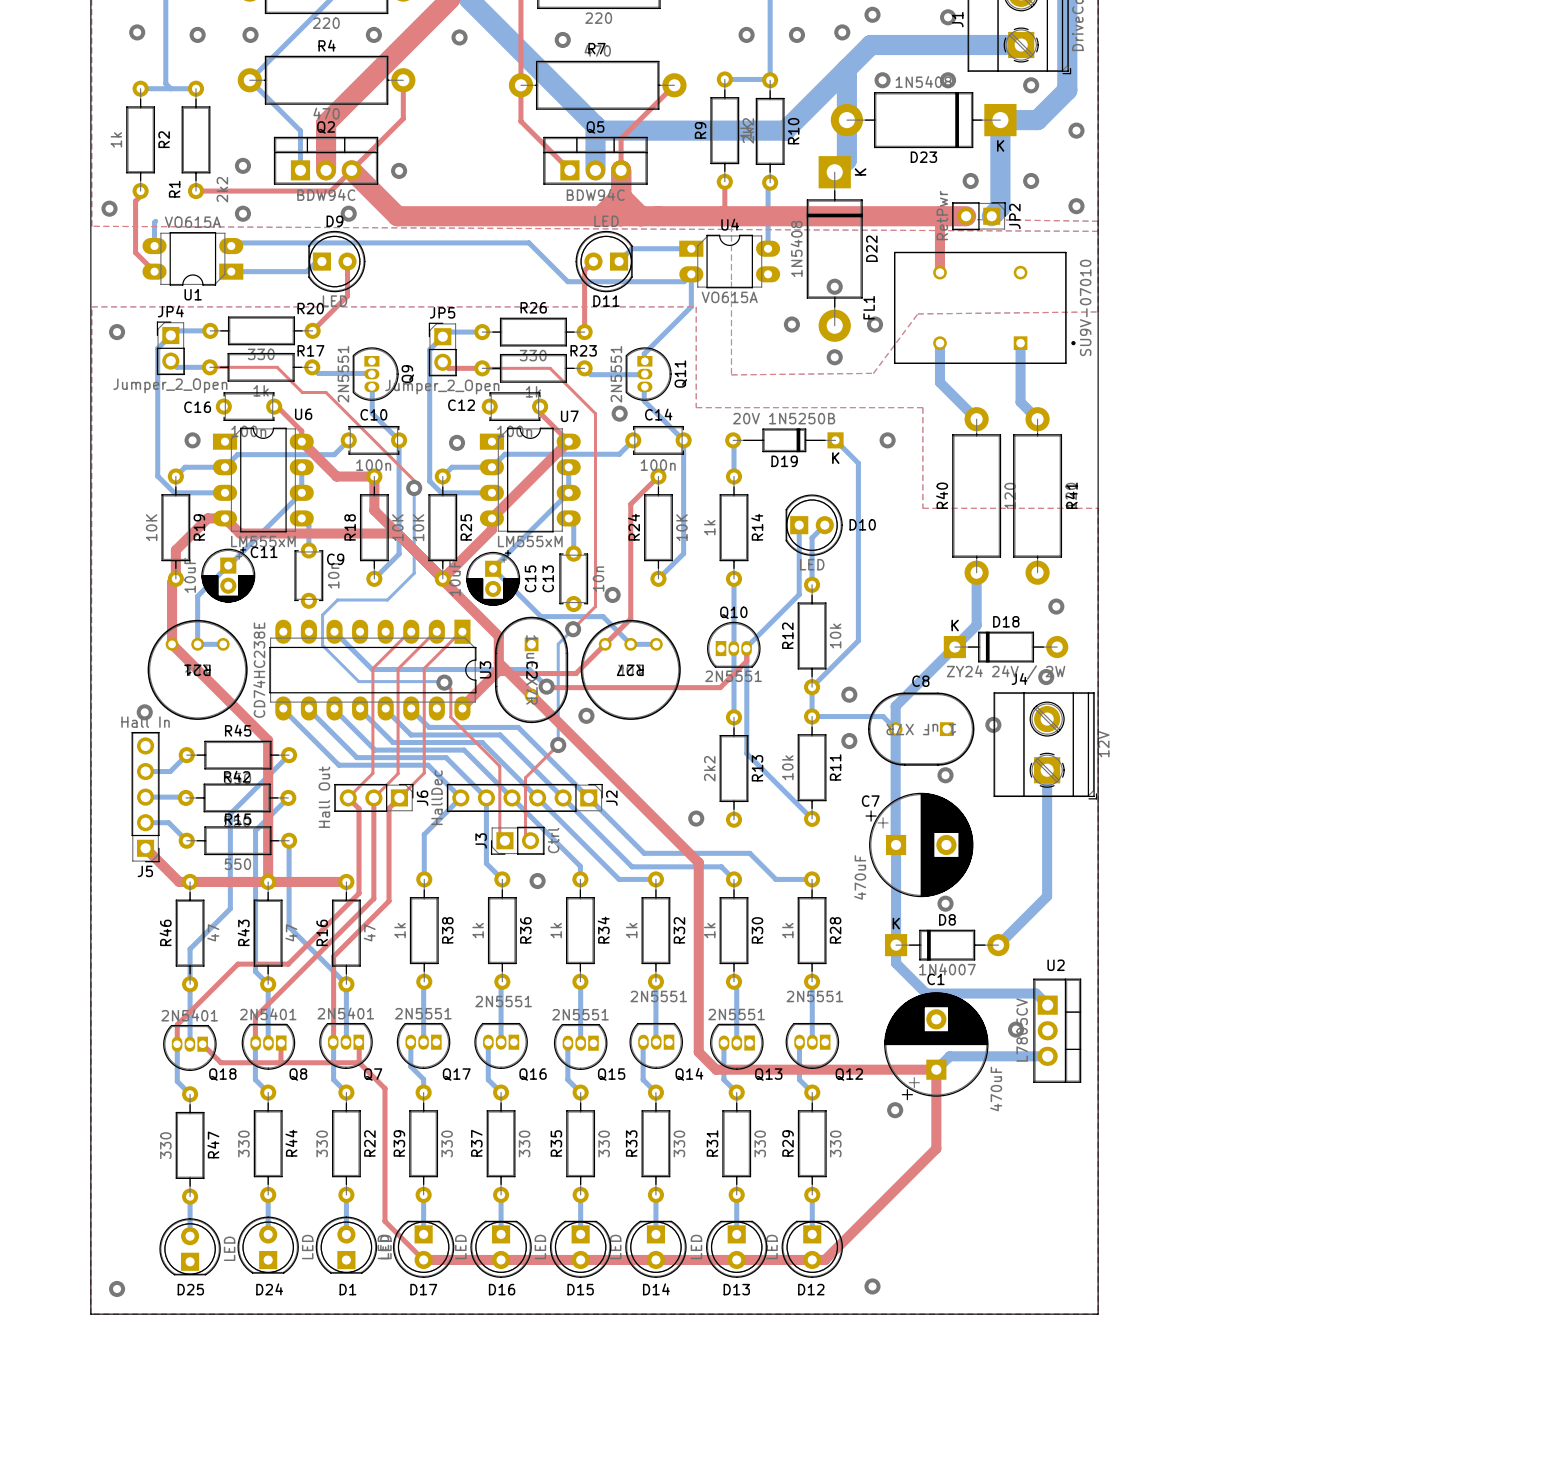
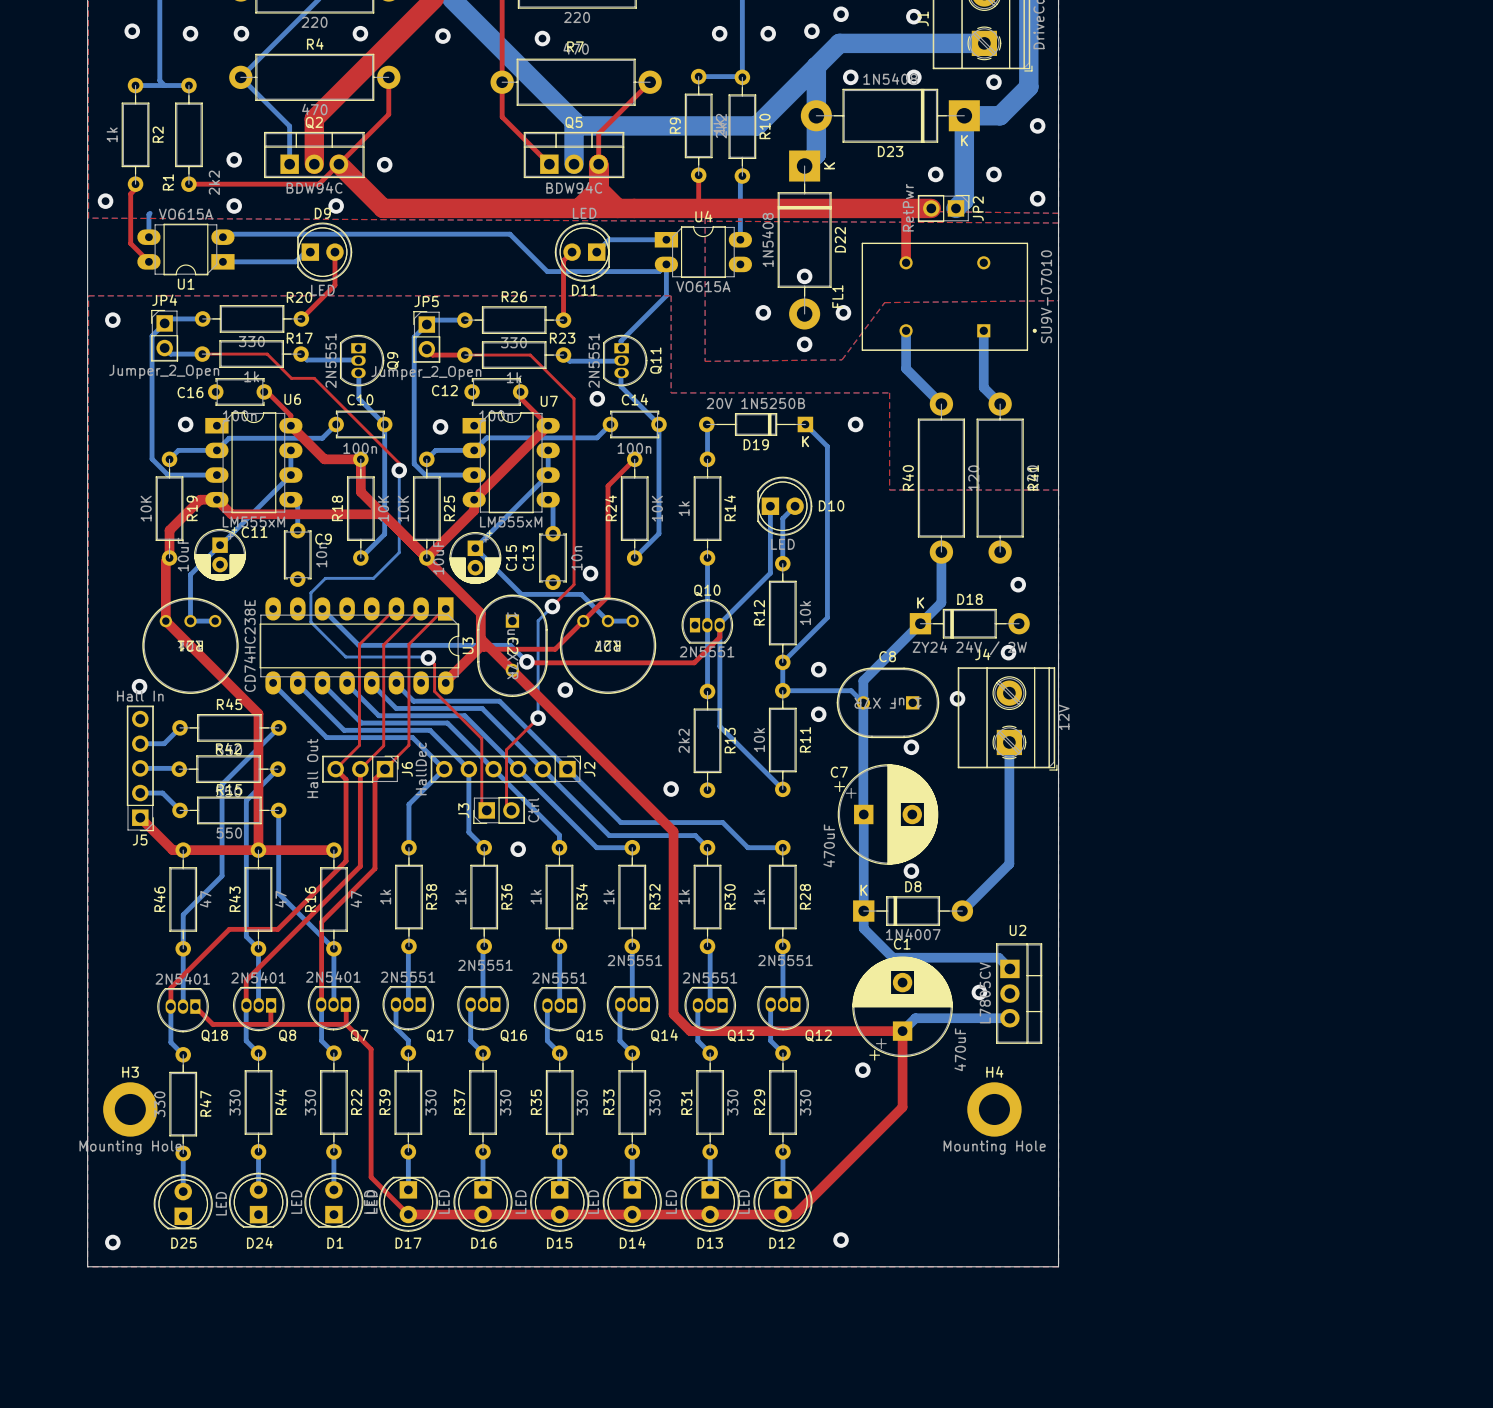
H3: none -> Mounting Hole (130, 1109)
H4: none -> Mounting Hole (994, 1109)

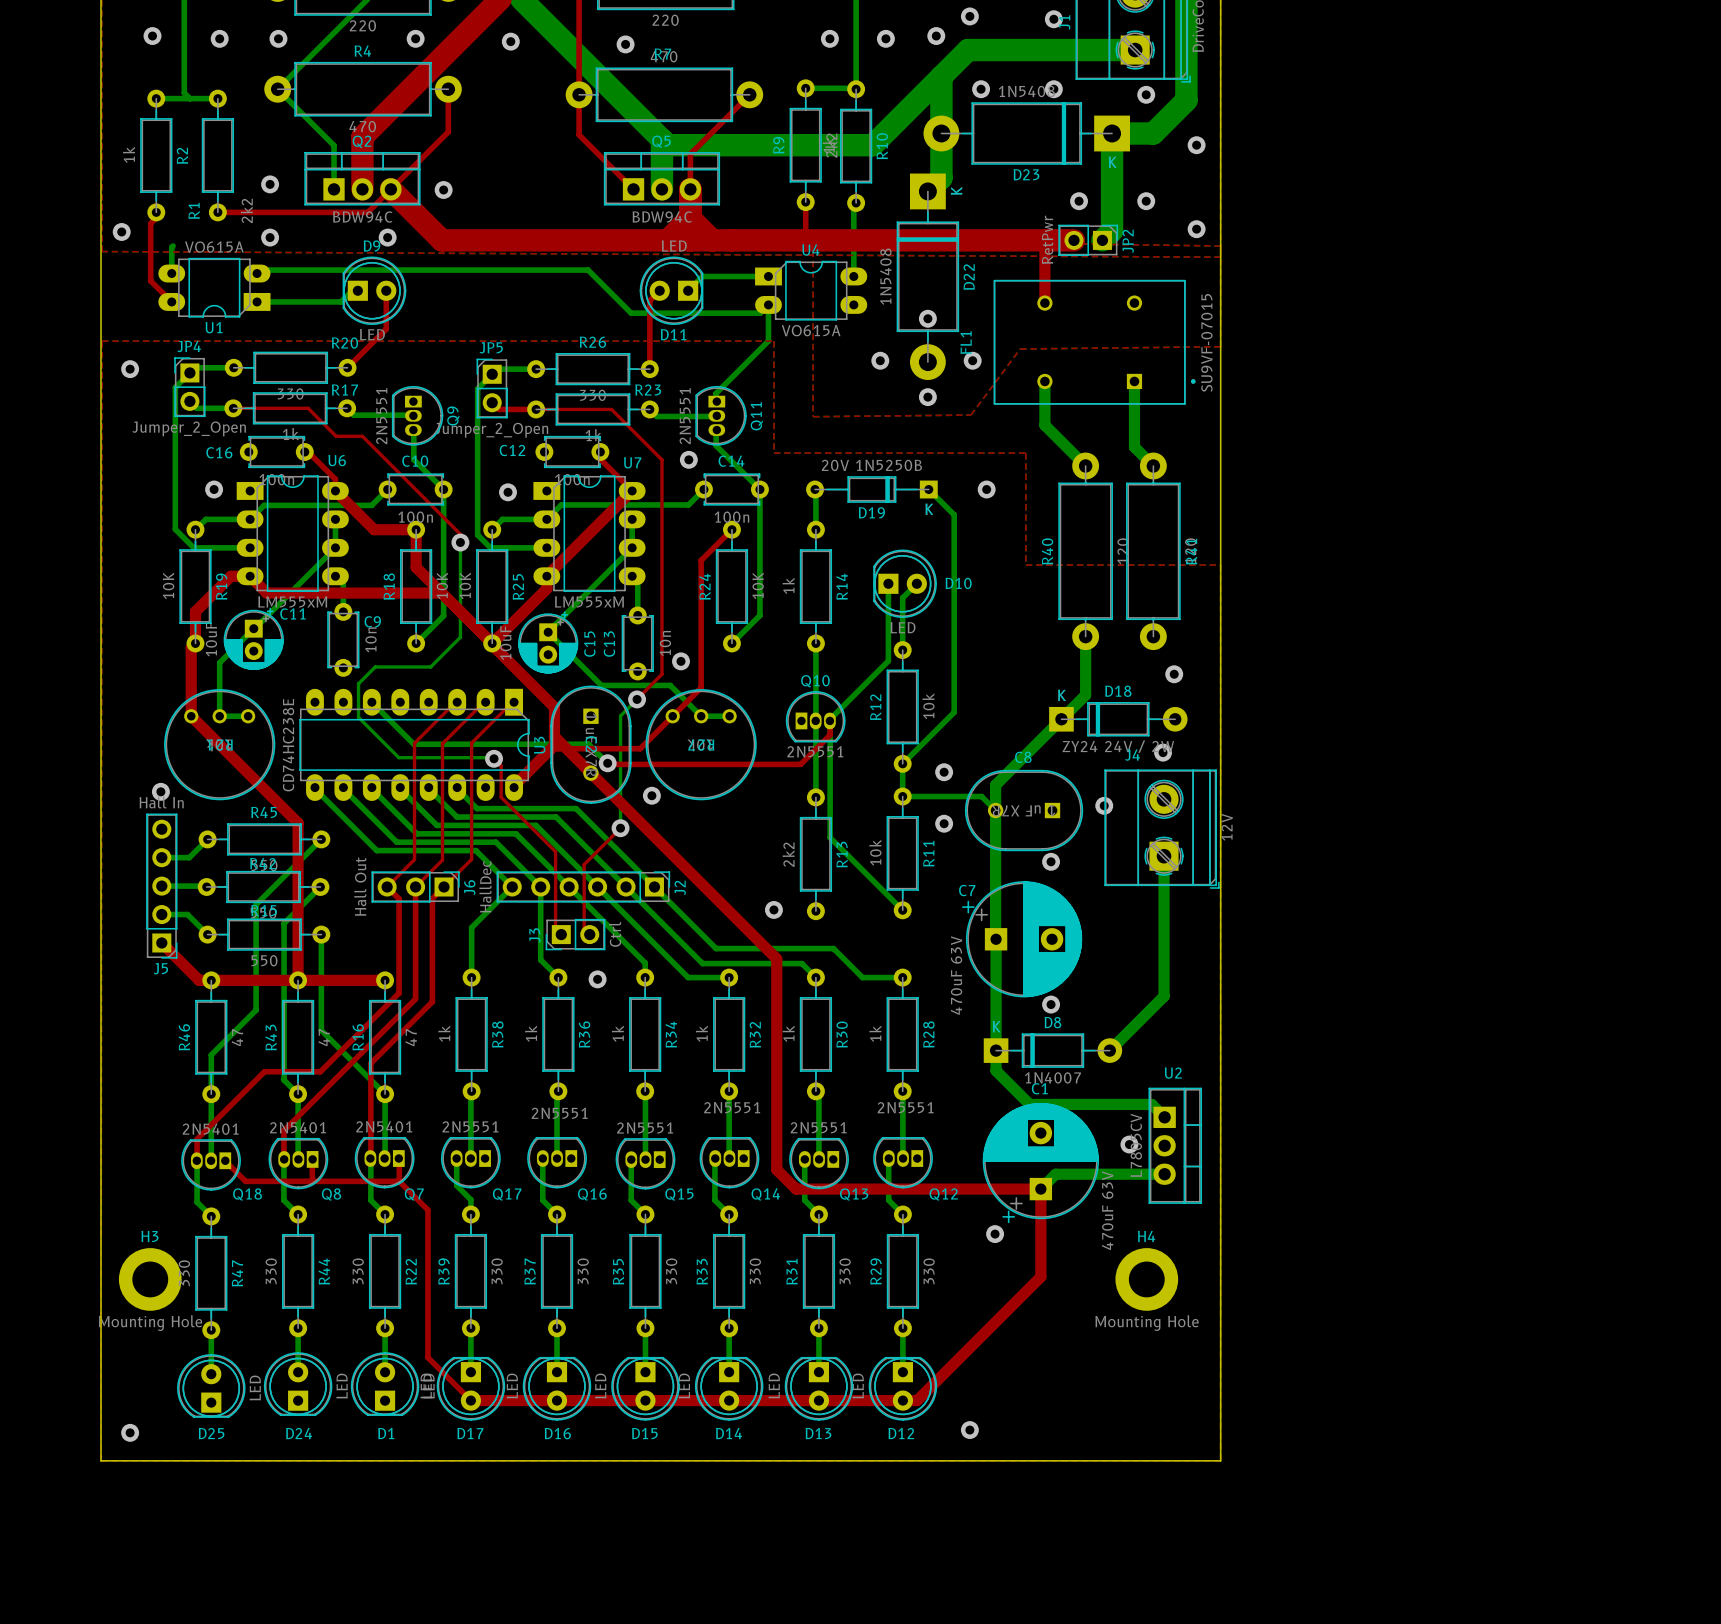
FL1 value: SU9V-07010 (1046, 296) -> SU9VF-07015 (1206, 342)
C7 value: 470uF (829, 845) -> 470uF 63V (956, 975)
C1 value: 470uF (960, 1049) -> 470uF 63V (1107, 1210)

